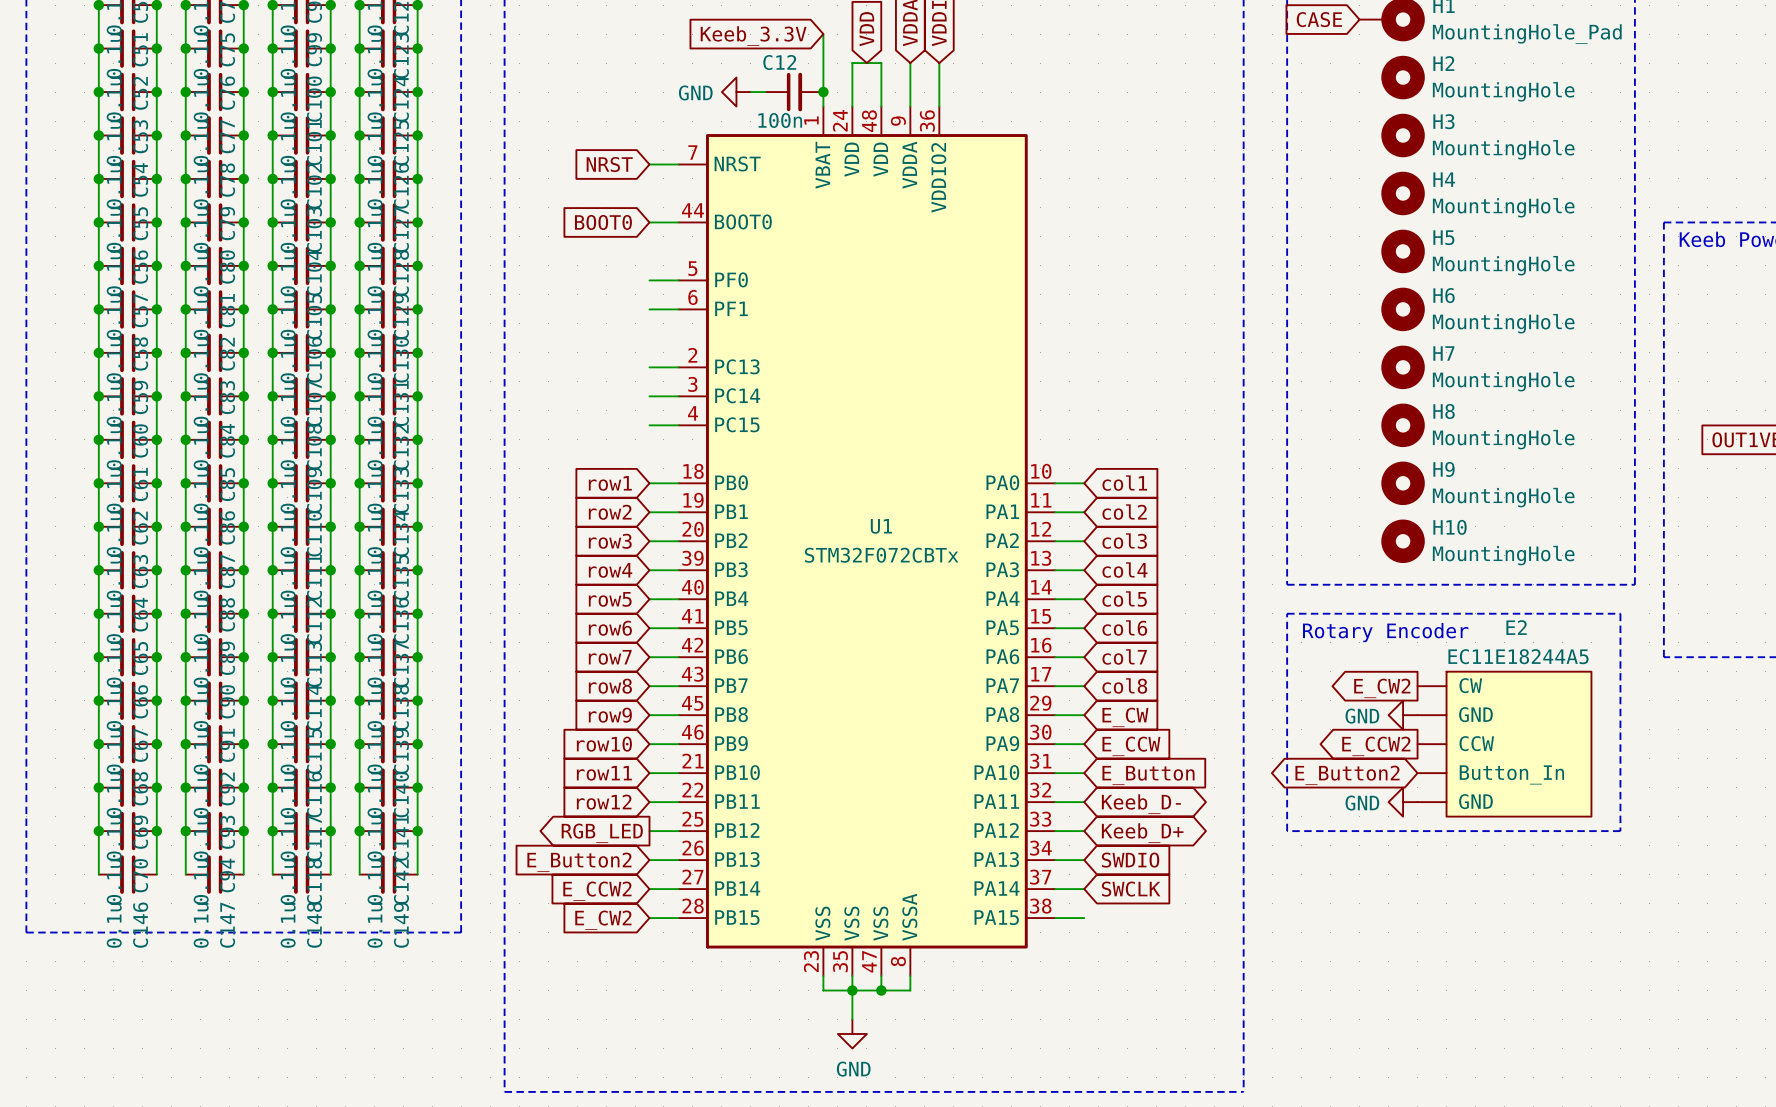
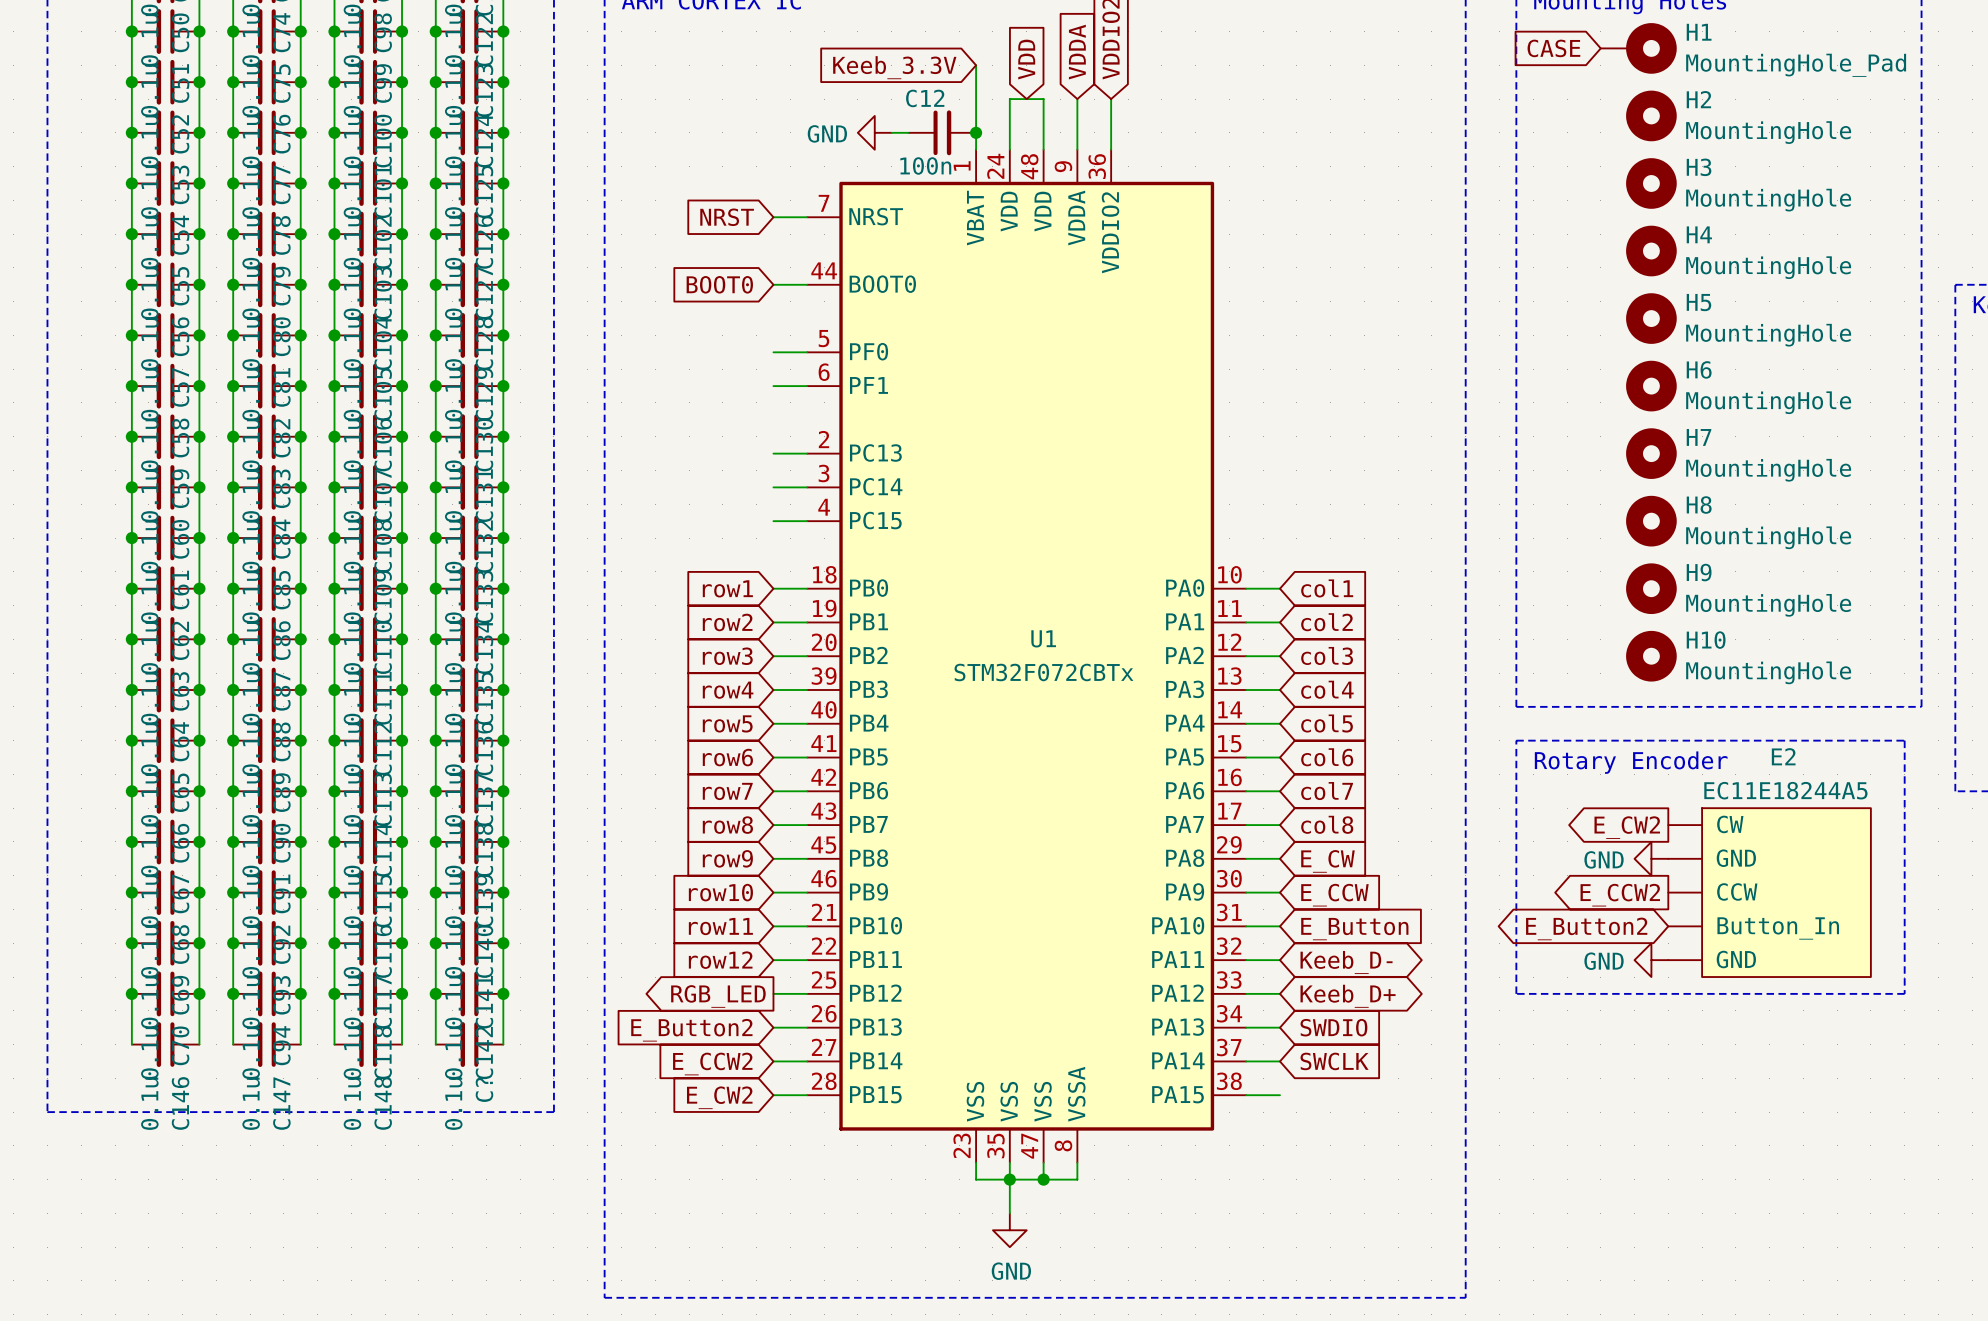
C149 name: C149 (401, 925) -> C? (484, 1089)

